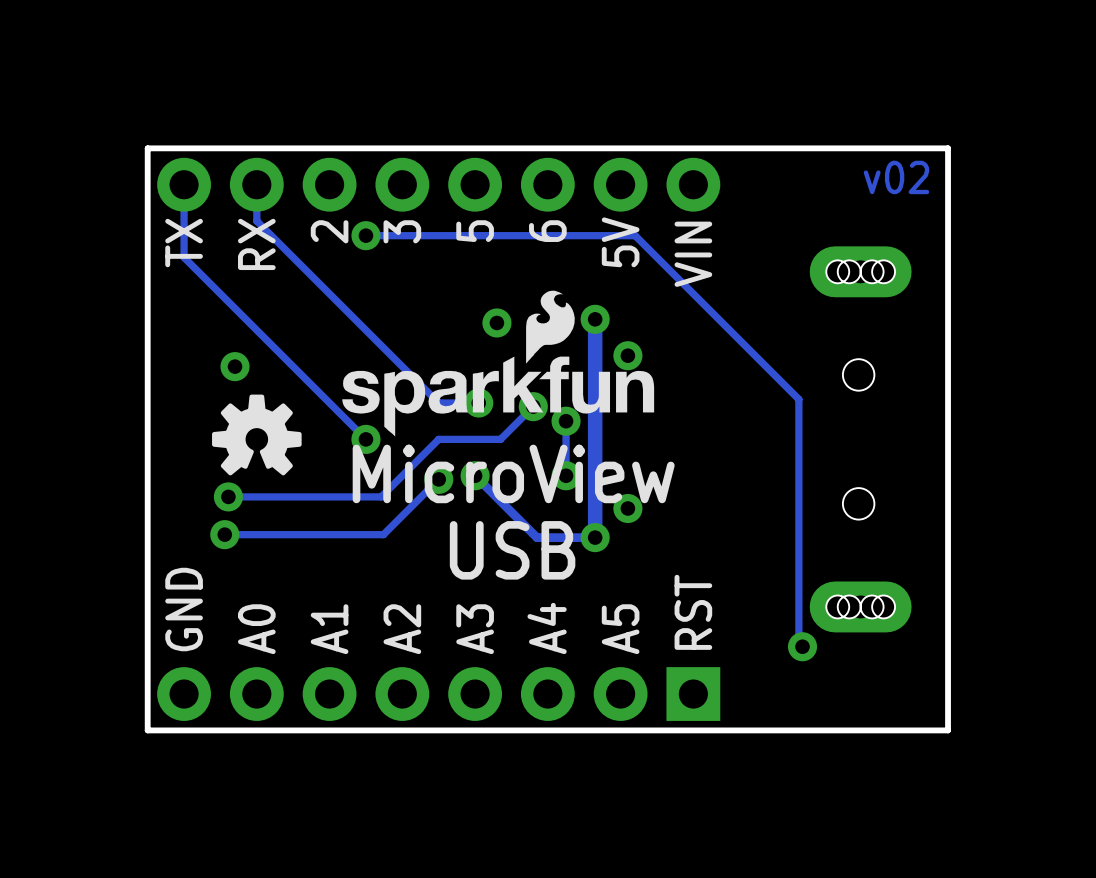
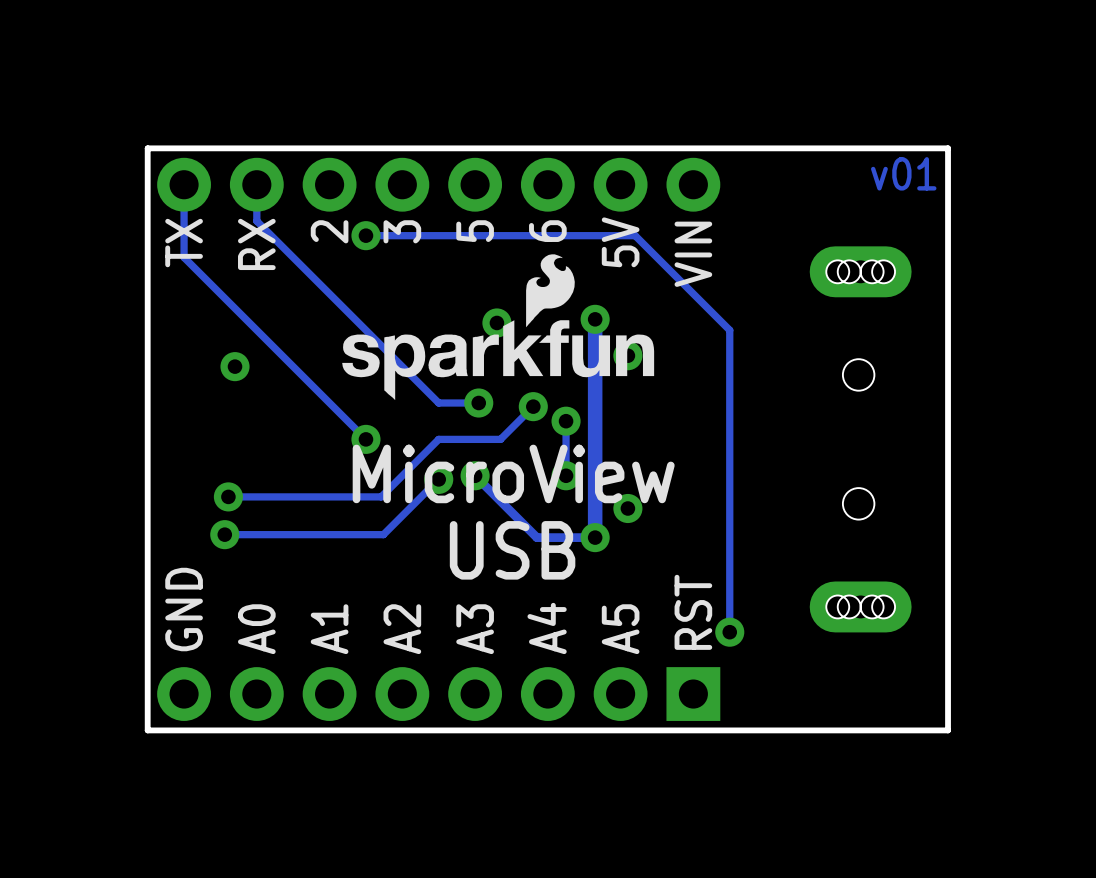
text: v02 (896, 177) -> v01 (903, 173)
track: (729, 330) (798, 399) (798, 643) (802, 646) -> (729, 330) (729, 632)
drawing position: (498, 363) -> (498, 327)
drawing: [212, 394, 302, 476] -> none
via position: (802, 646) -> (729, 632)

